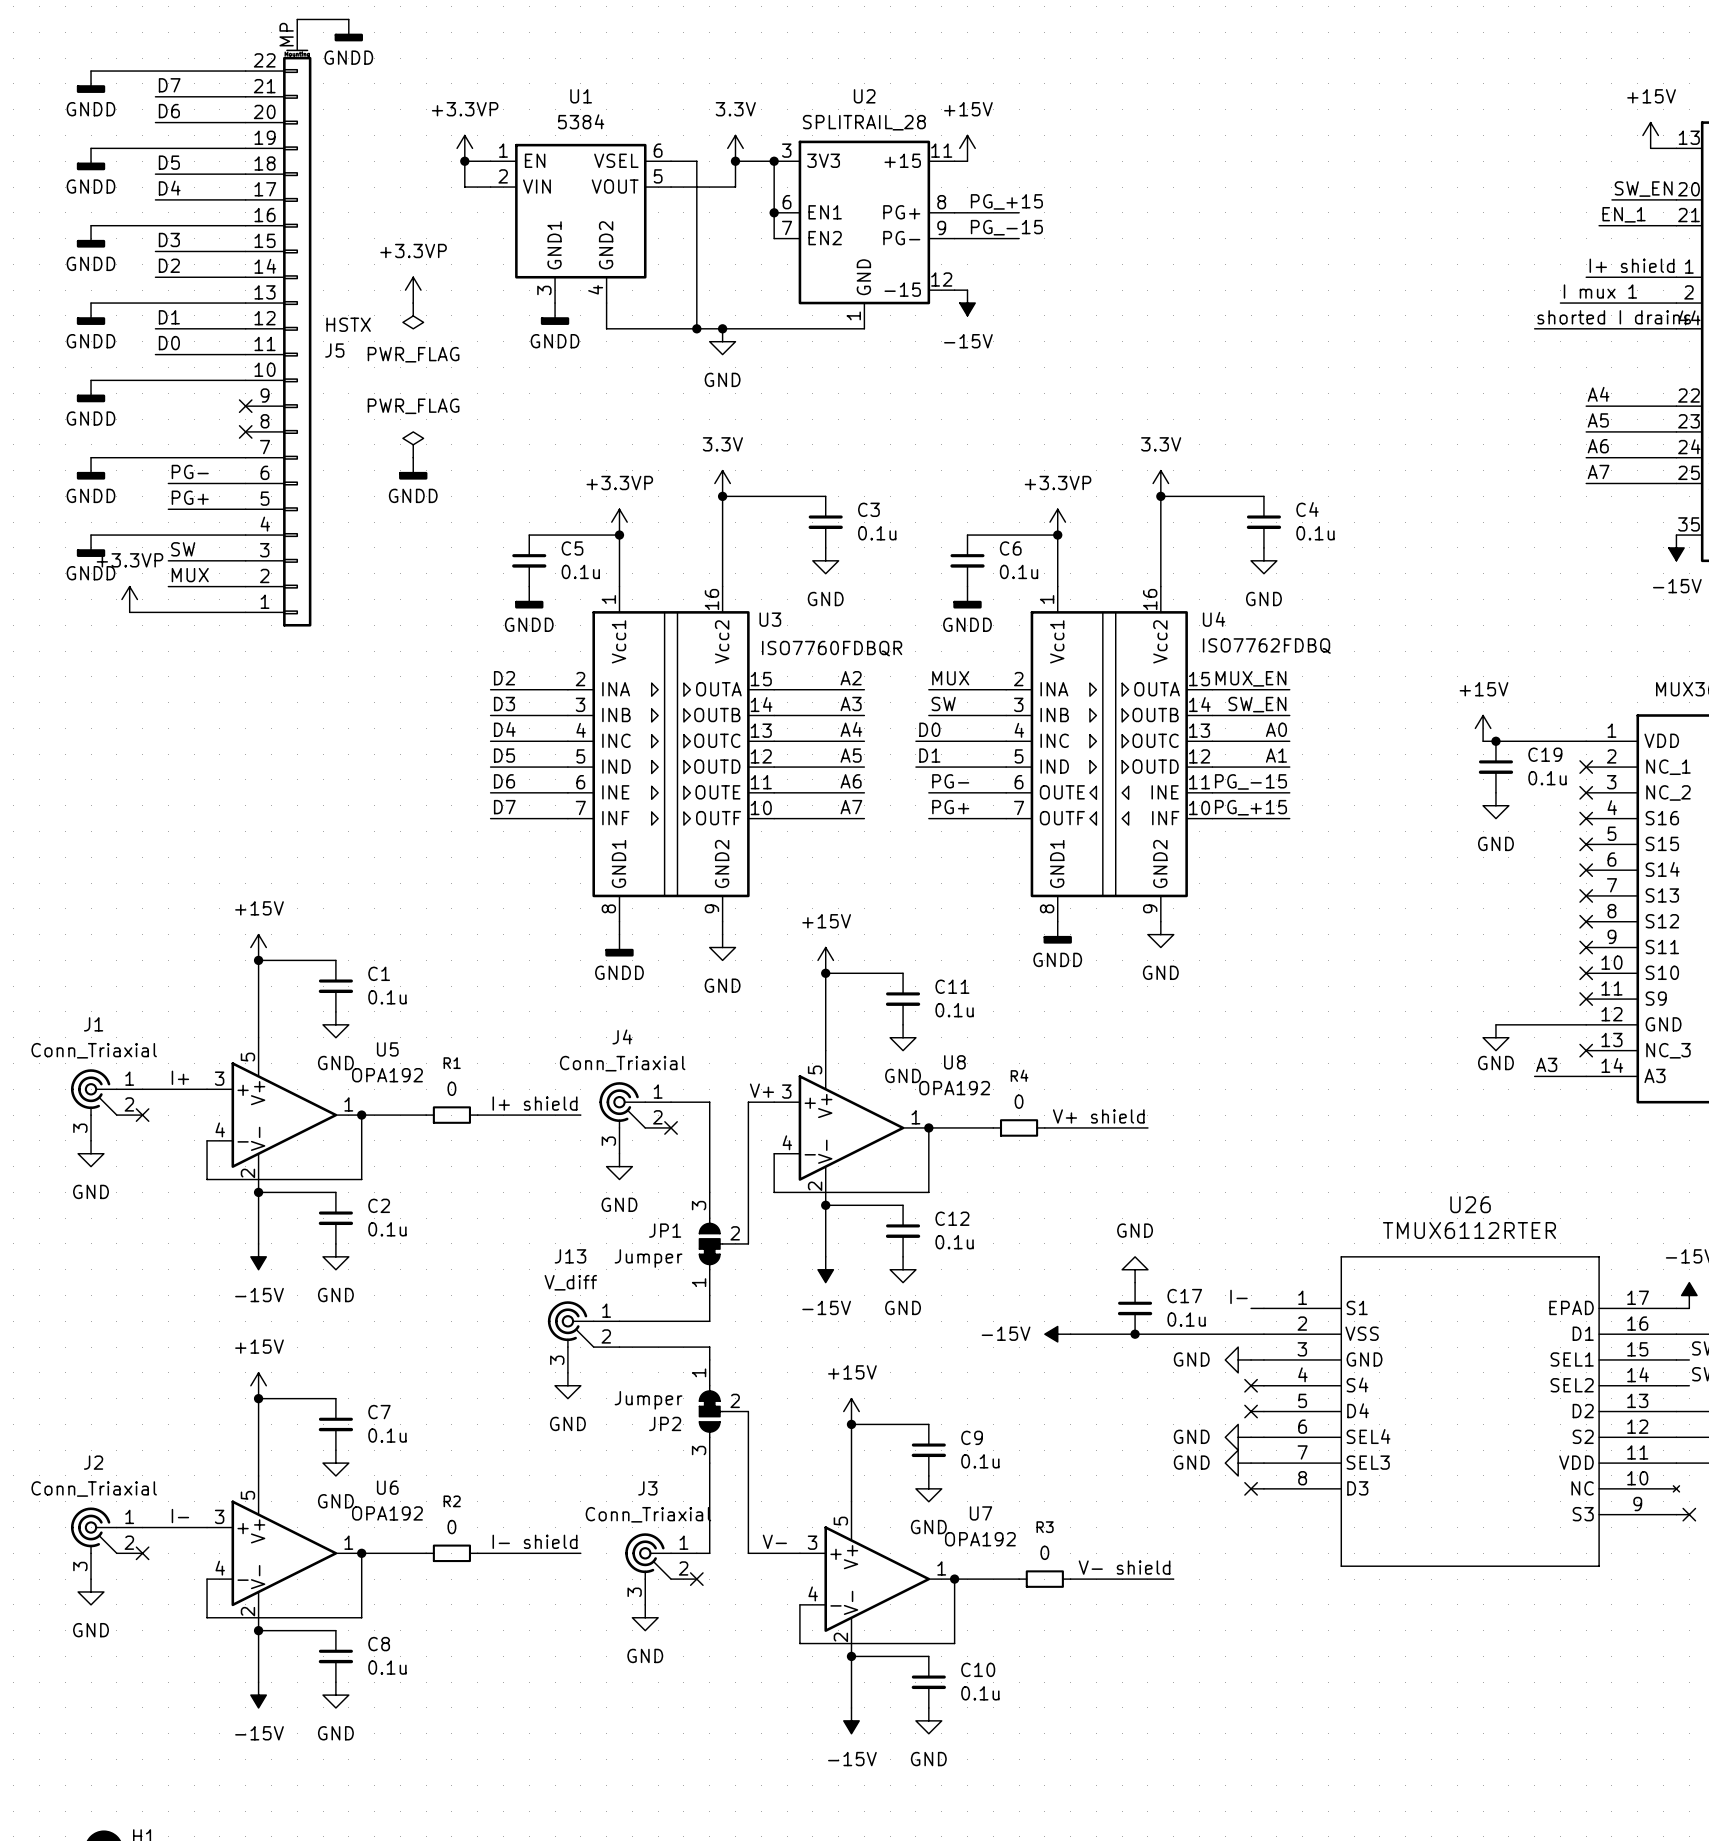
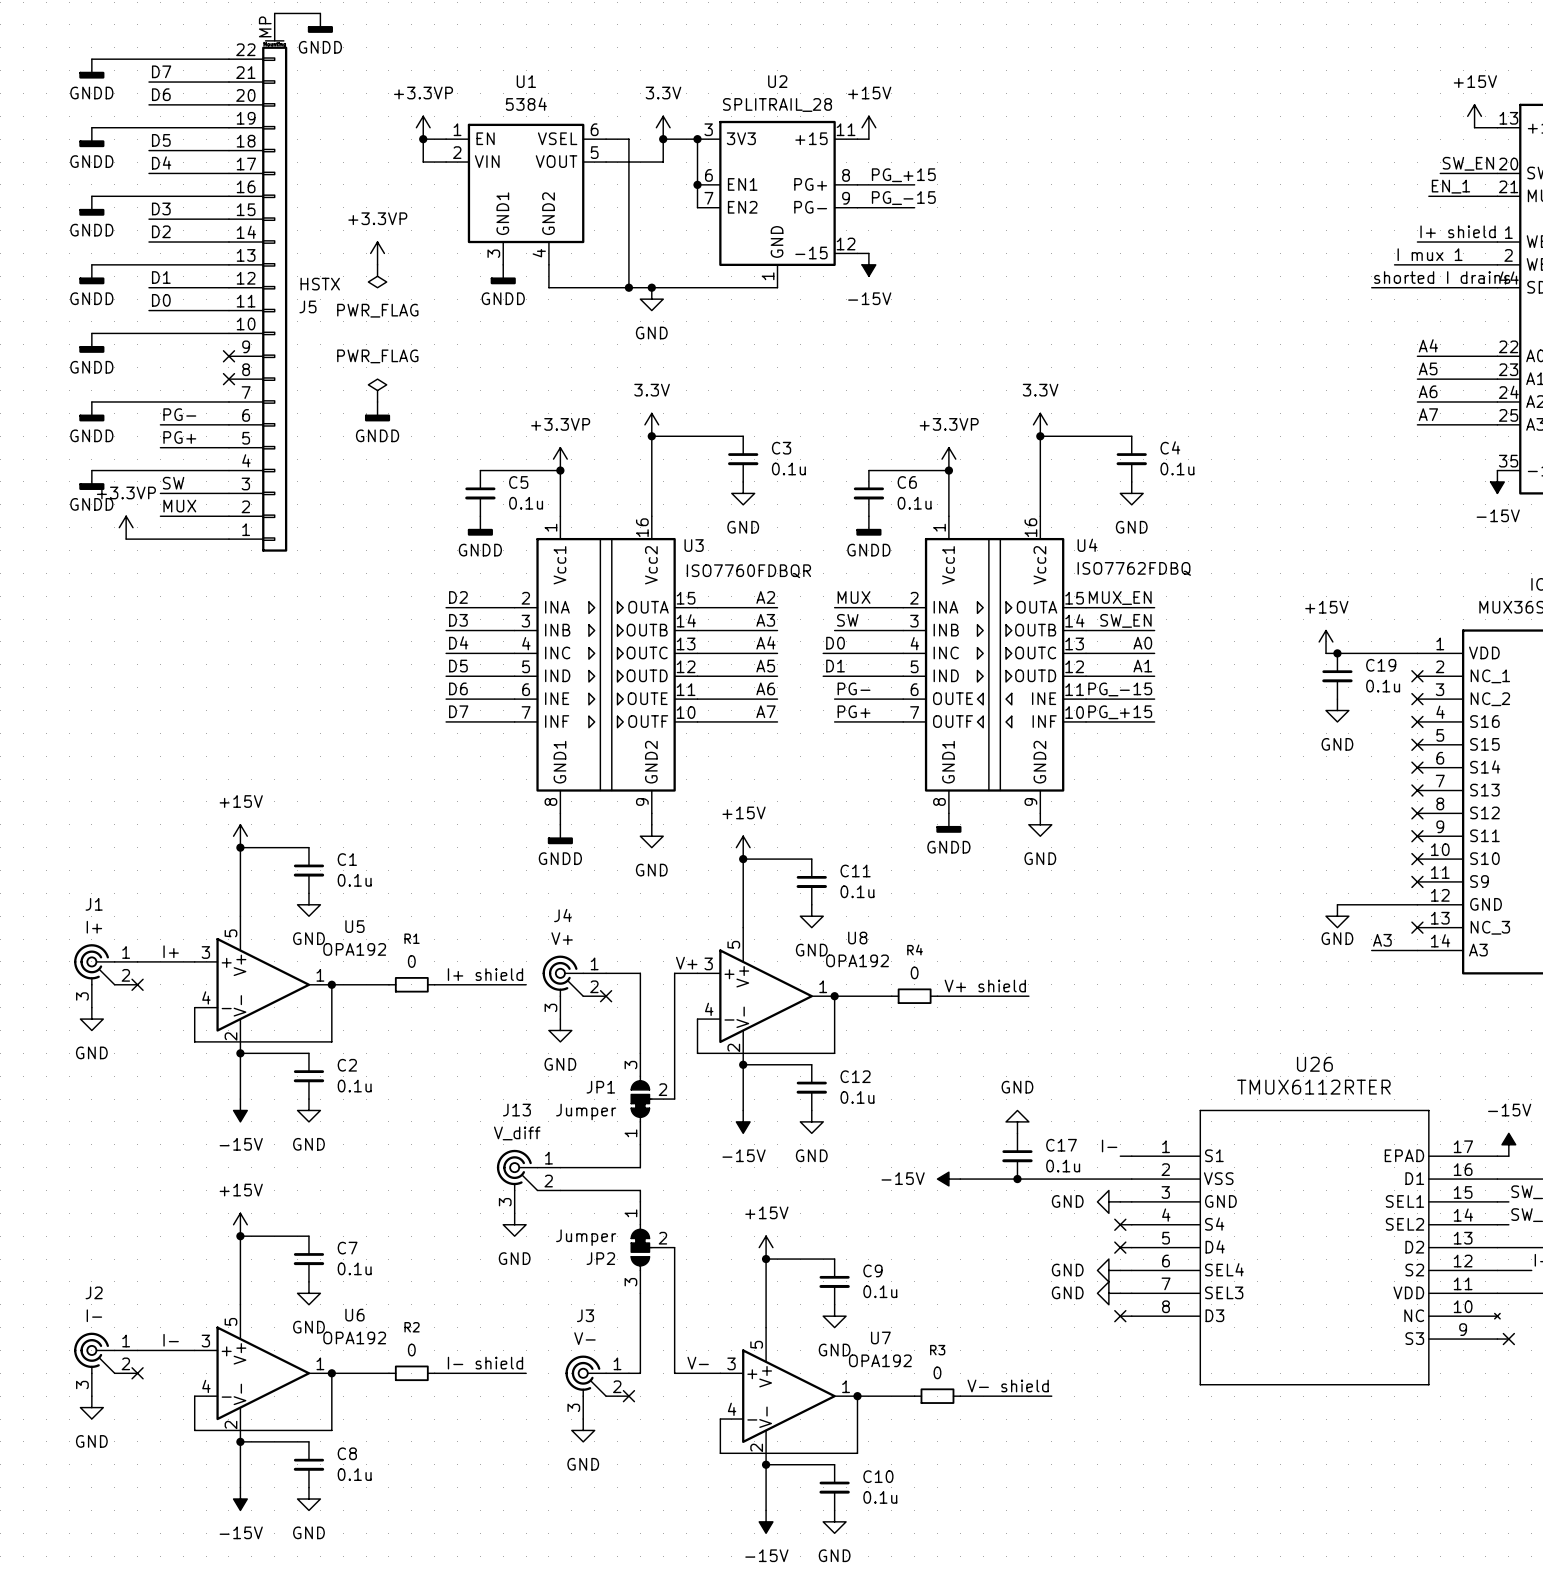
J1 value: Conn_Triaxial (94, 1050) -> I+ (94, 927)
J4 value: Conn_Triaxial (622, 1063) -> V+ (562, 938)
J2 value: Conn_Triaxial (94, 1489) -> I- (94, 1315)
J3 value: Conn_Triaxial (648, 1514) -> V- (584, 1338)

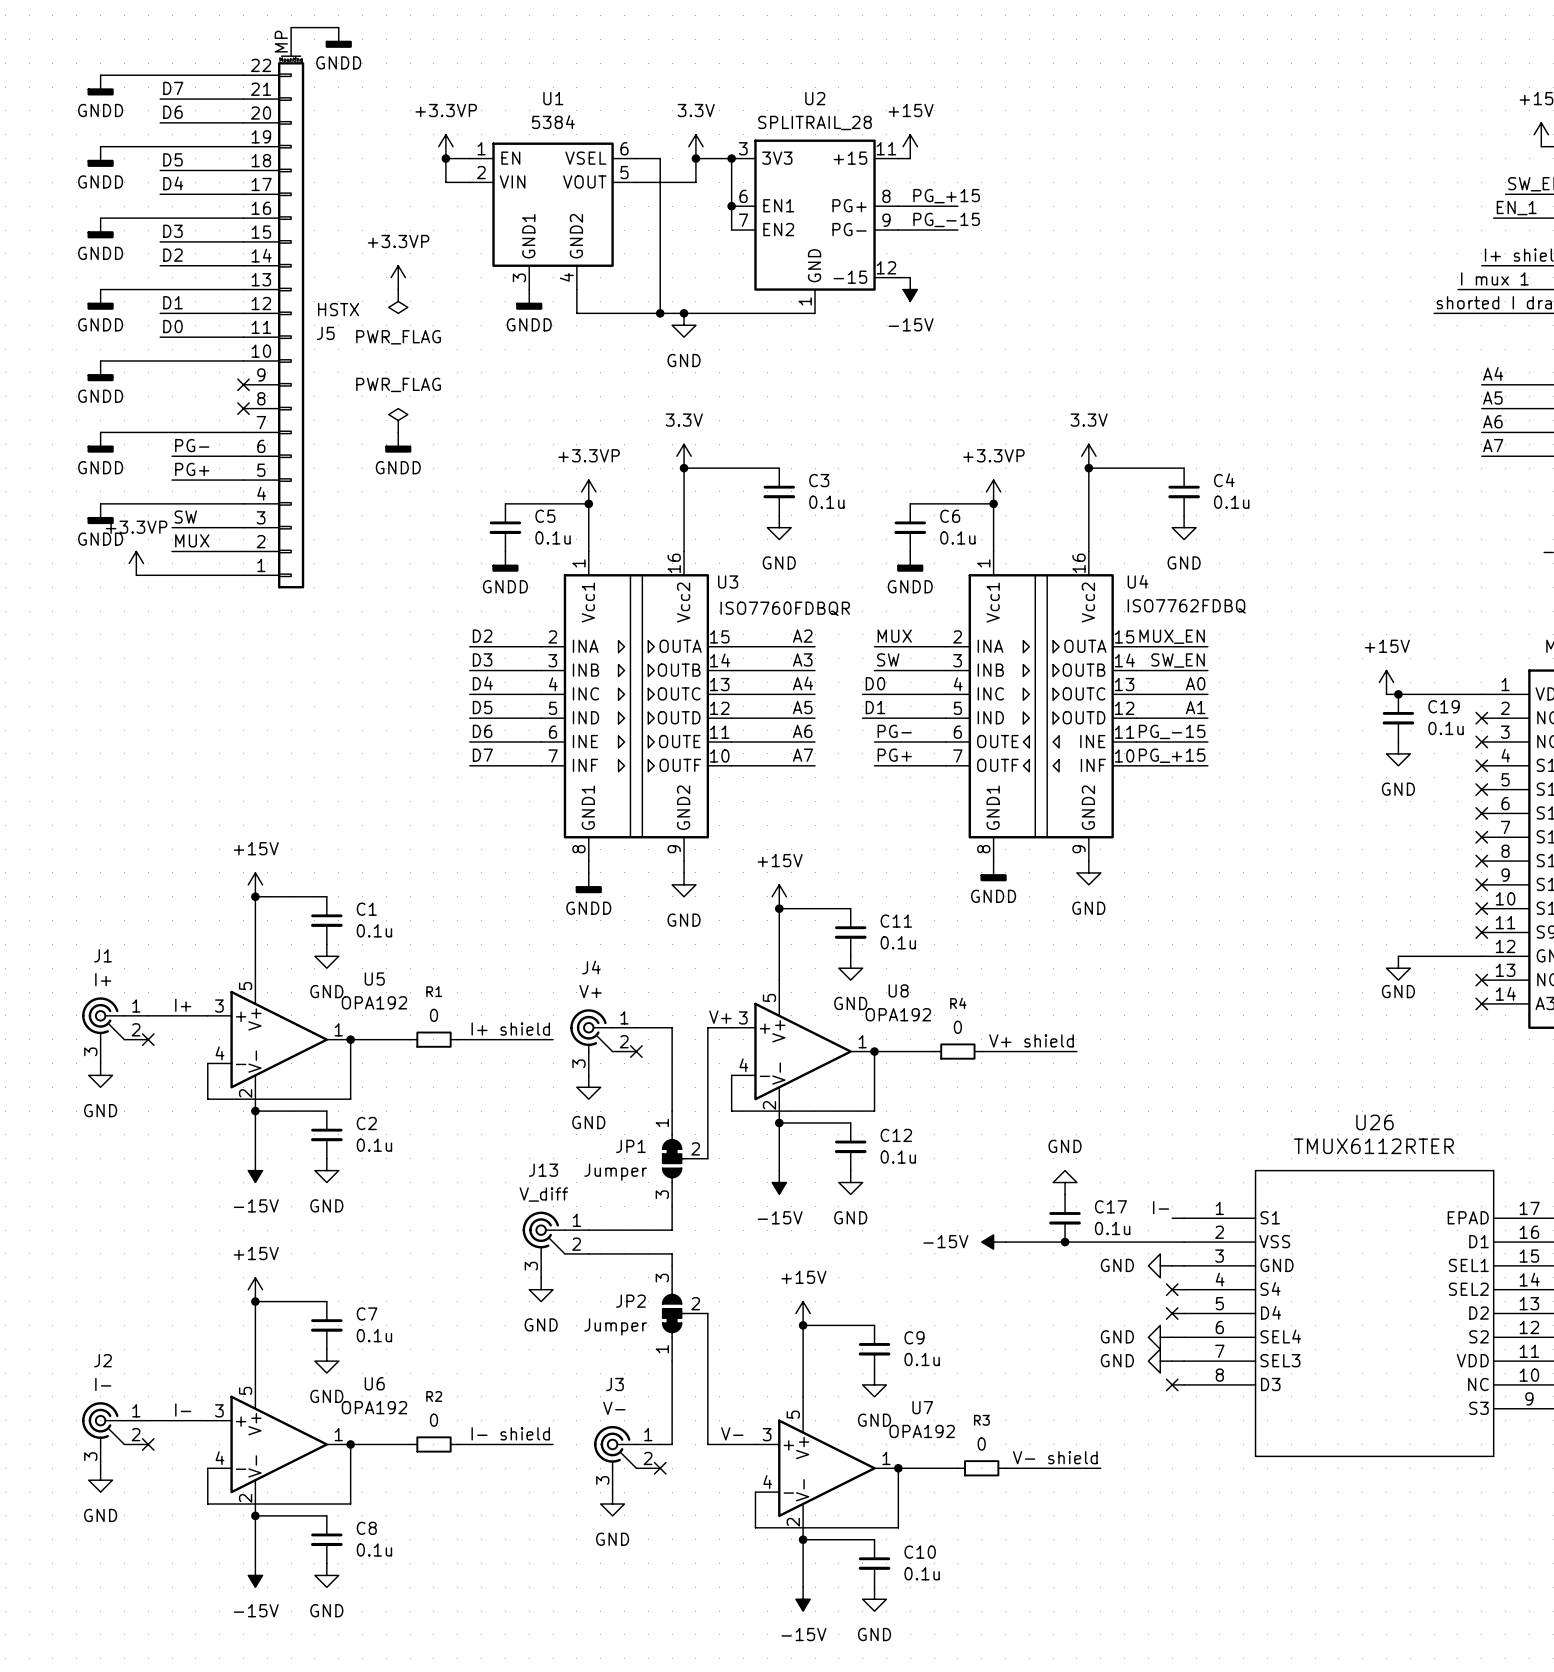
label: A3 (1382, 940) -> none
wire: (1371, 950) (1417, 950) -> none
no-connect mark: none -> (1481, 1003)
JP1 flip: as is (641, 1099) -> up-down (673, 1158)
JP2 flip: as is (641, 1247) -> up-down (673, 1313)

